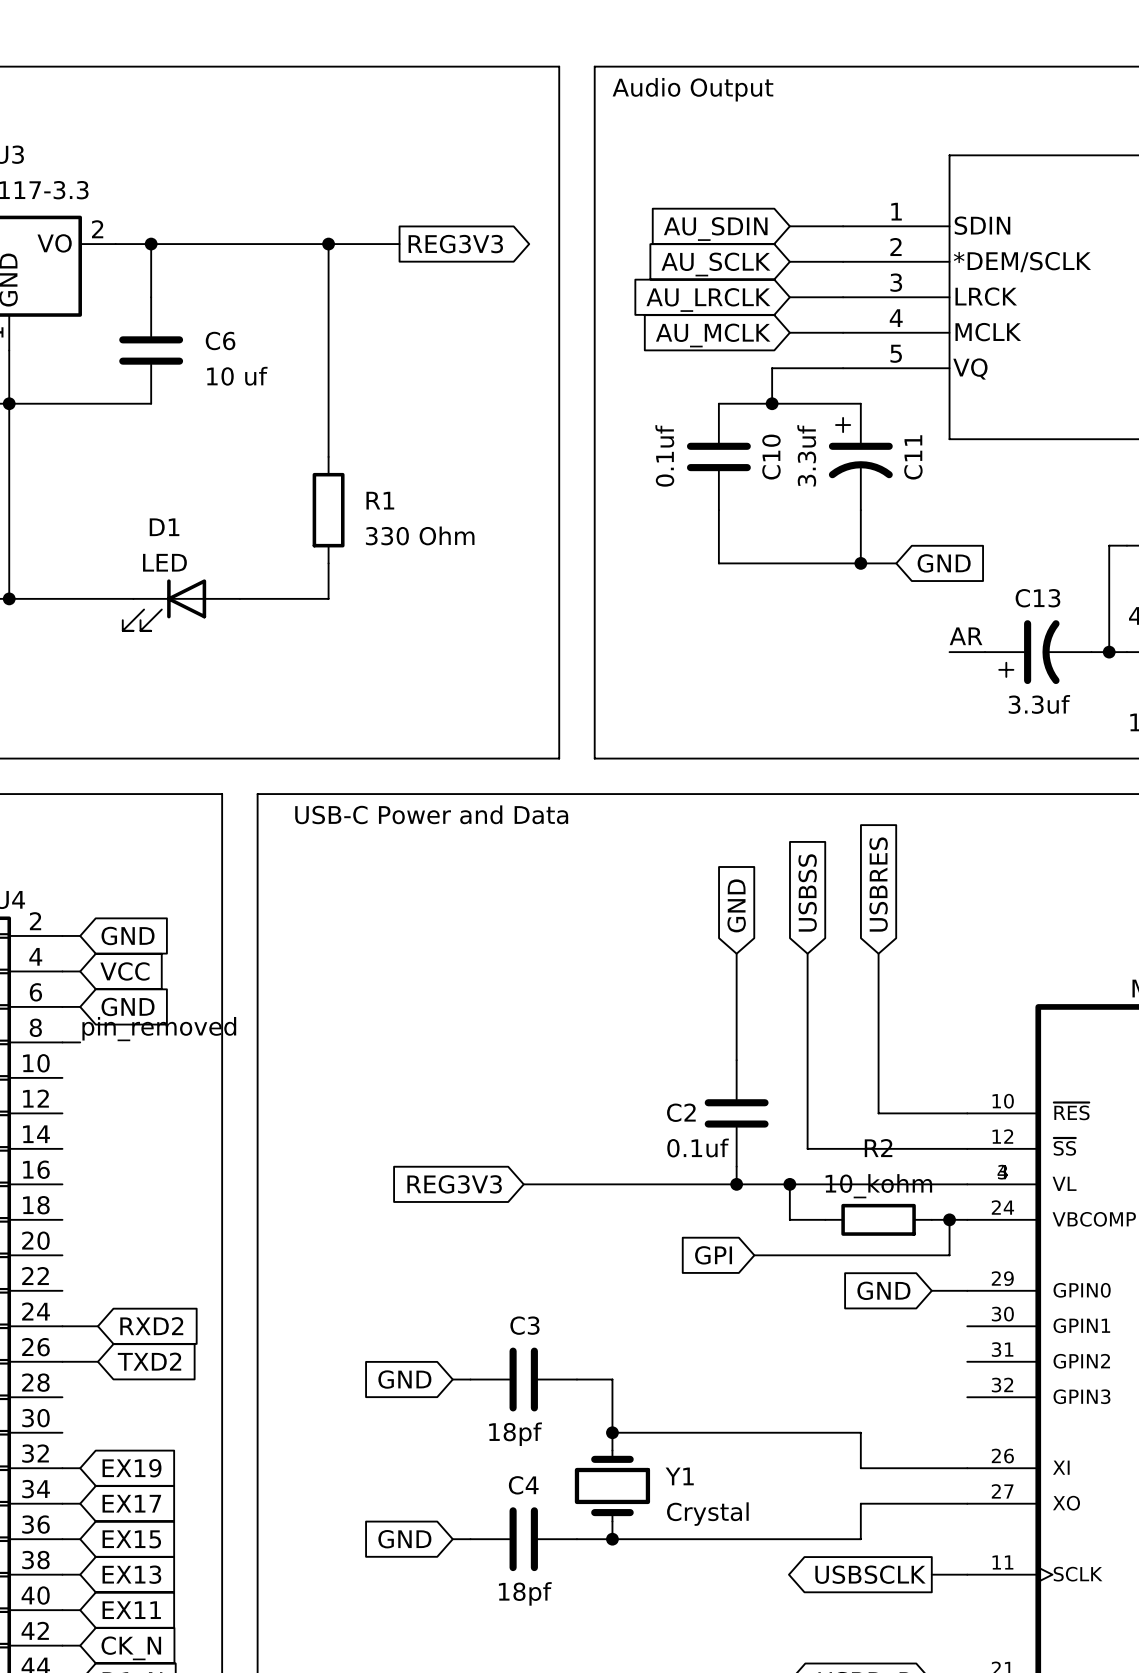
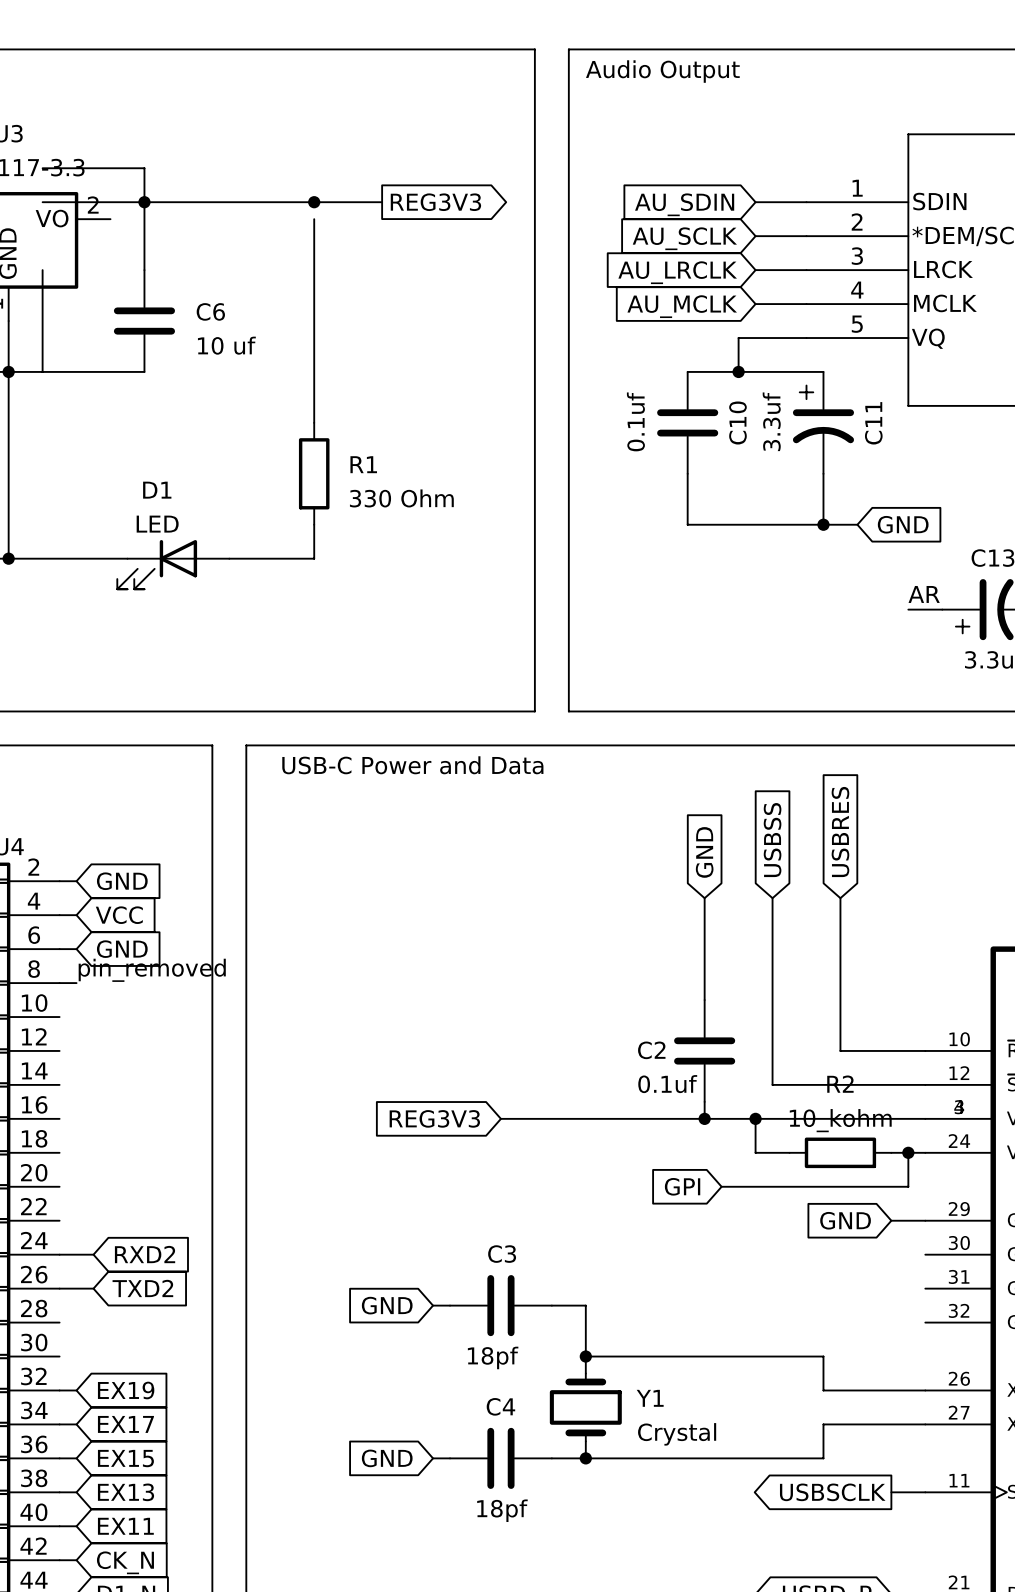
wire: none -> (42, 168) (144, 168) (144, 219)
wire: none -> (42, 202) (382, 202)
wire: (115, 244) (399, 244) -> none
junction position: (151, 244) -> (144, 202)
junction position: (328, 244) -> (314, 202)
global label position: REG3V3 (455, 244) -> REG3V3 (435, 202)
wire: none -> (42, 270) (42, 371)

